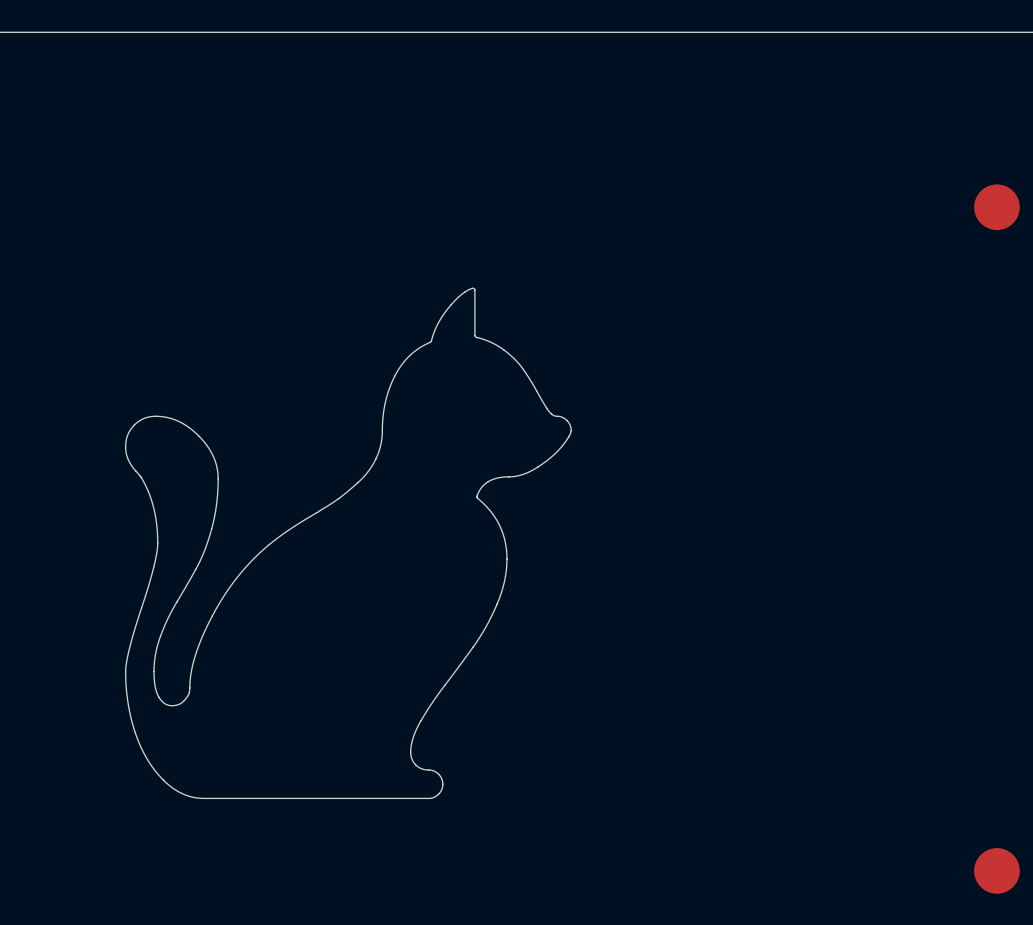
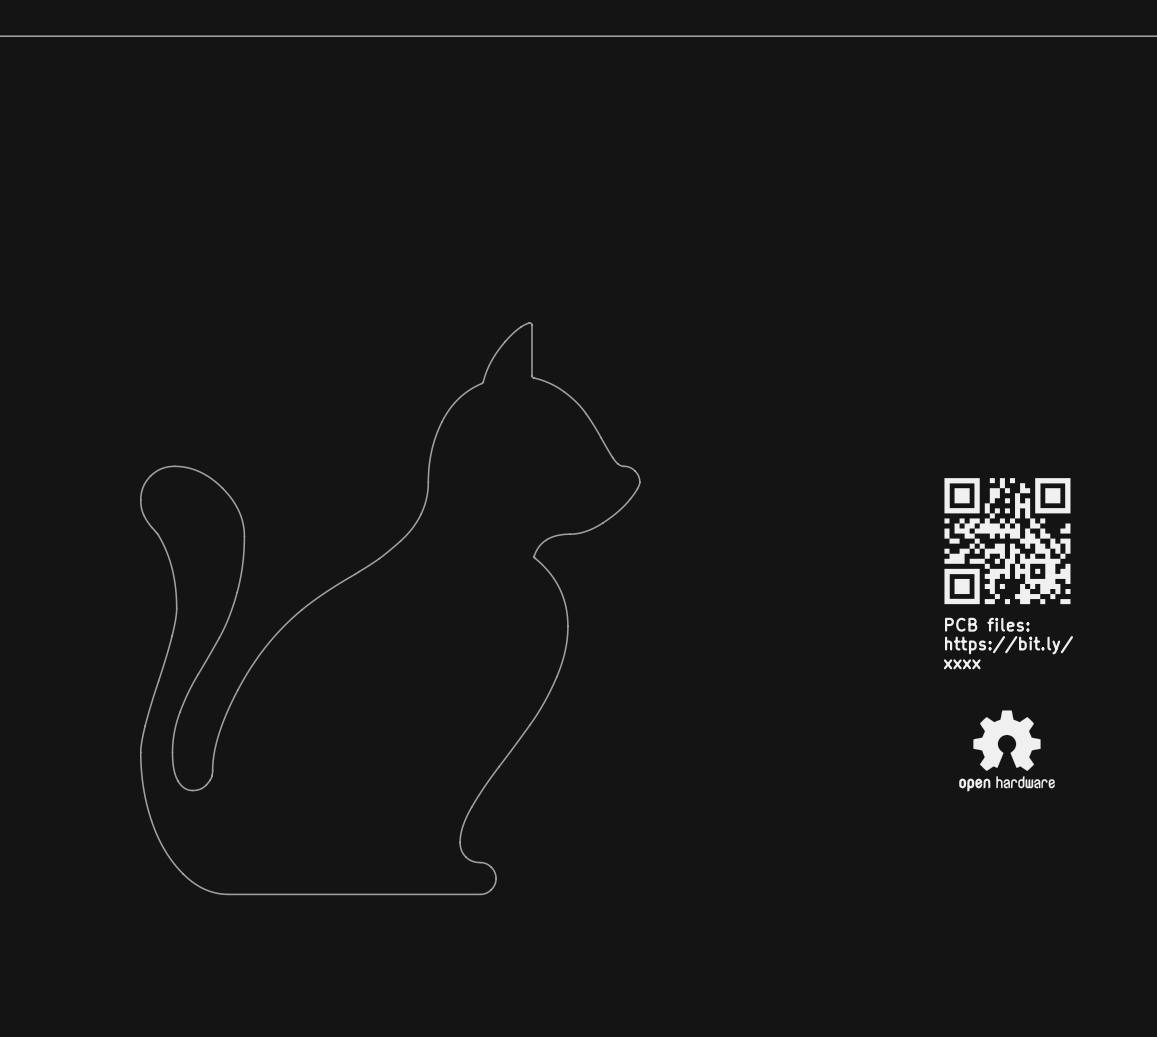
part: (996, 207) -> none
drawing: none -> [944, 478, 1071, 605]
text: none -> PCB files: (987, 624)
text: none -> https://bit.ly/ (1009, 645)
text: none -> xxxx (962, 664)
drawing: none -> [959, 710, 1055, 792]
part: (996, 870) -> none

